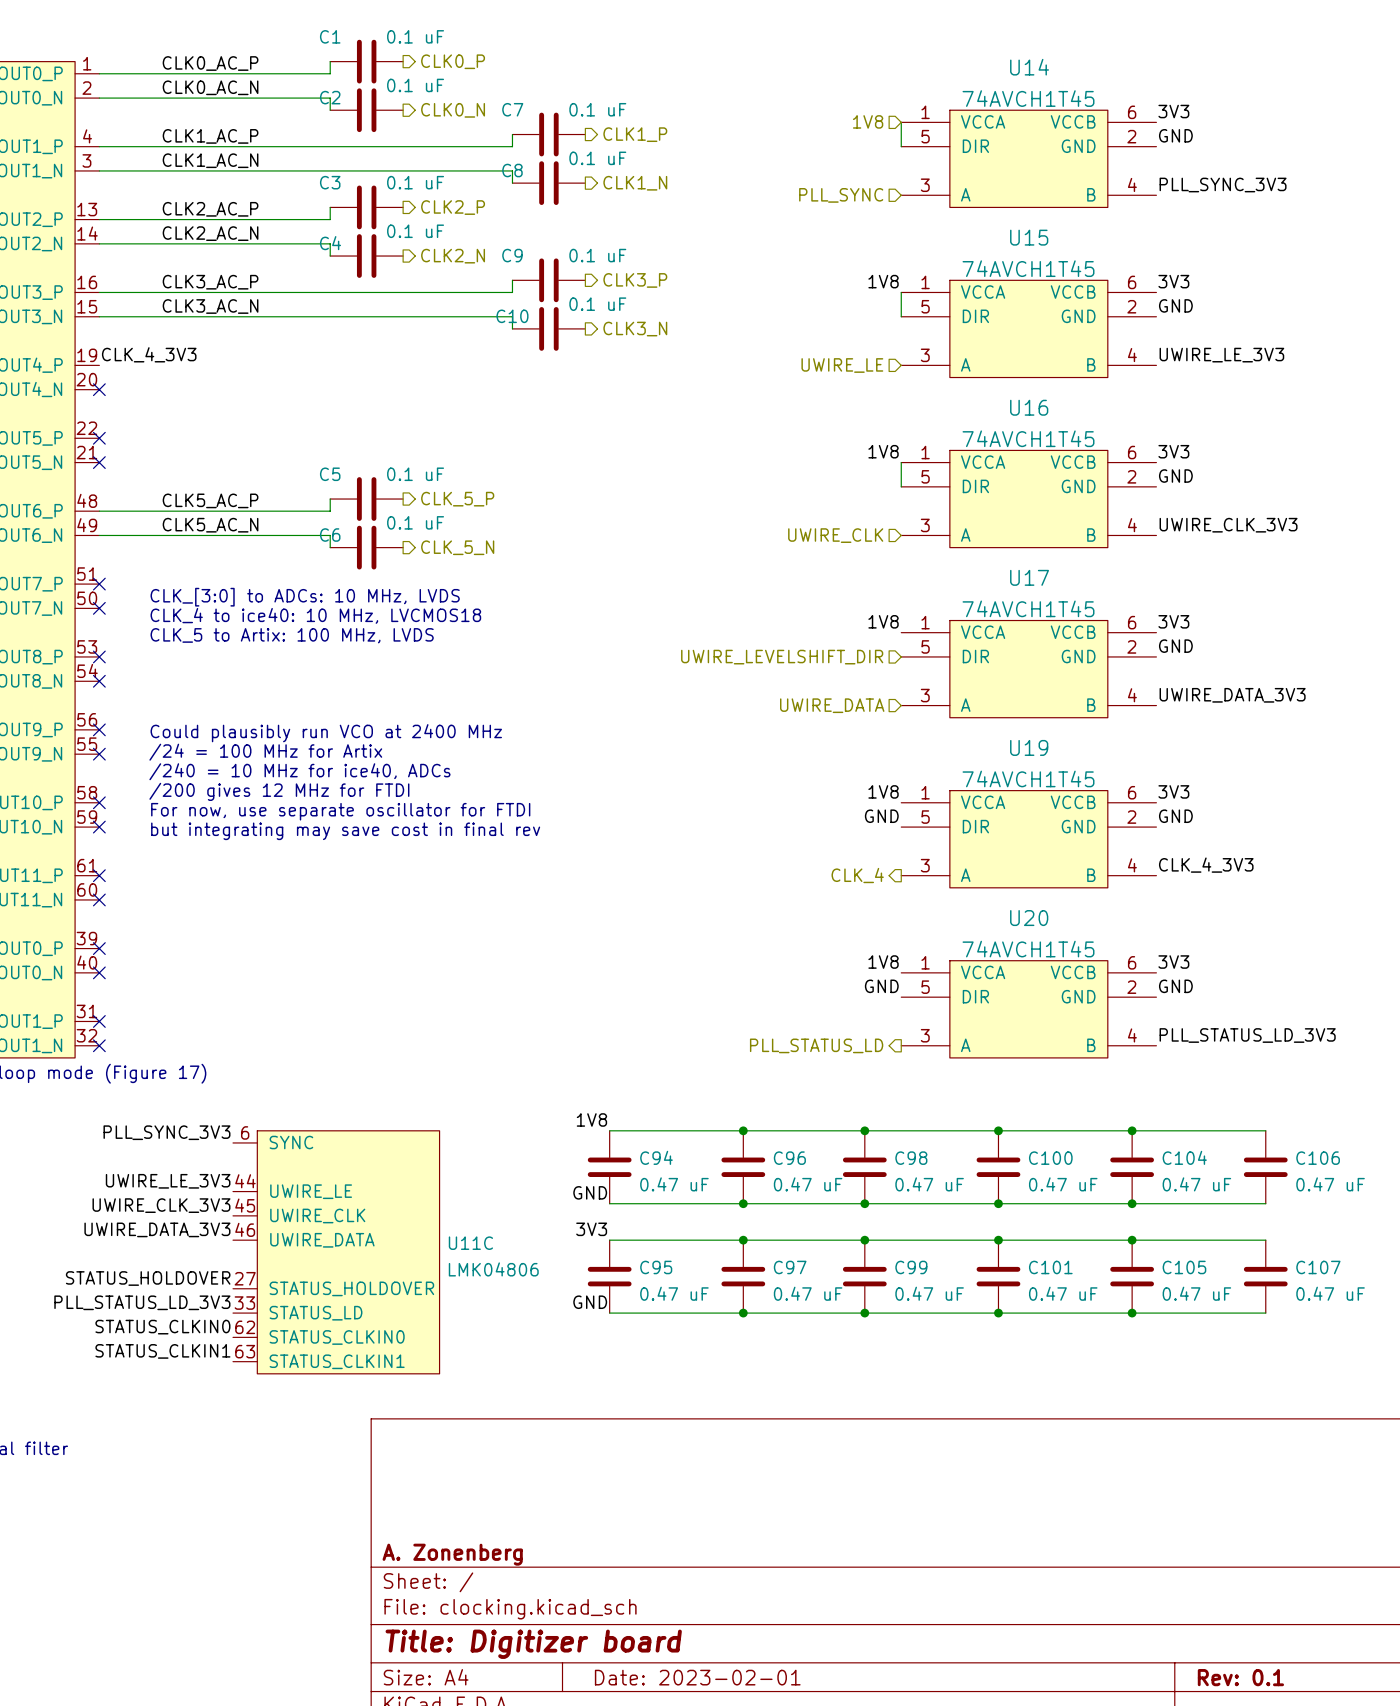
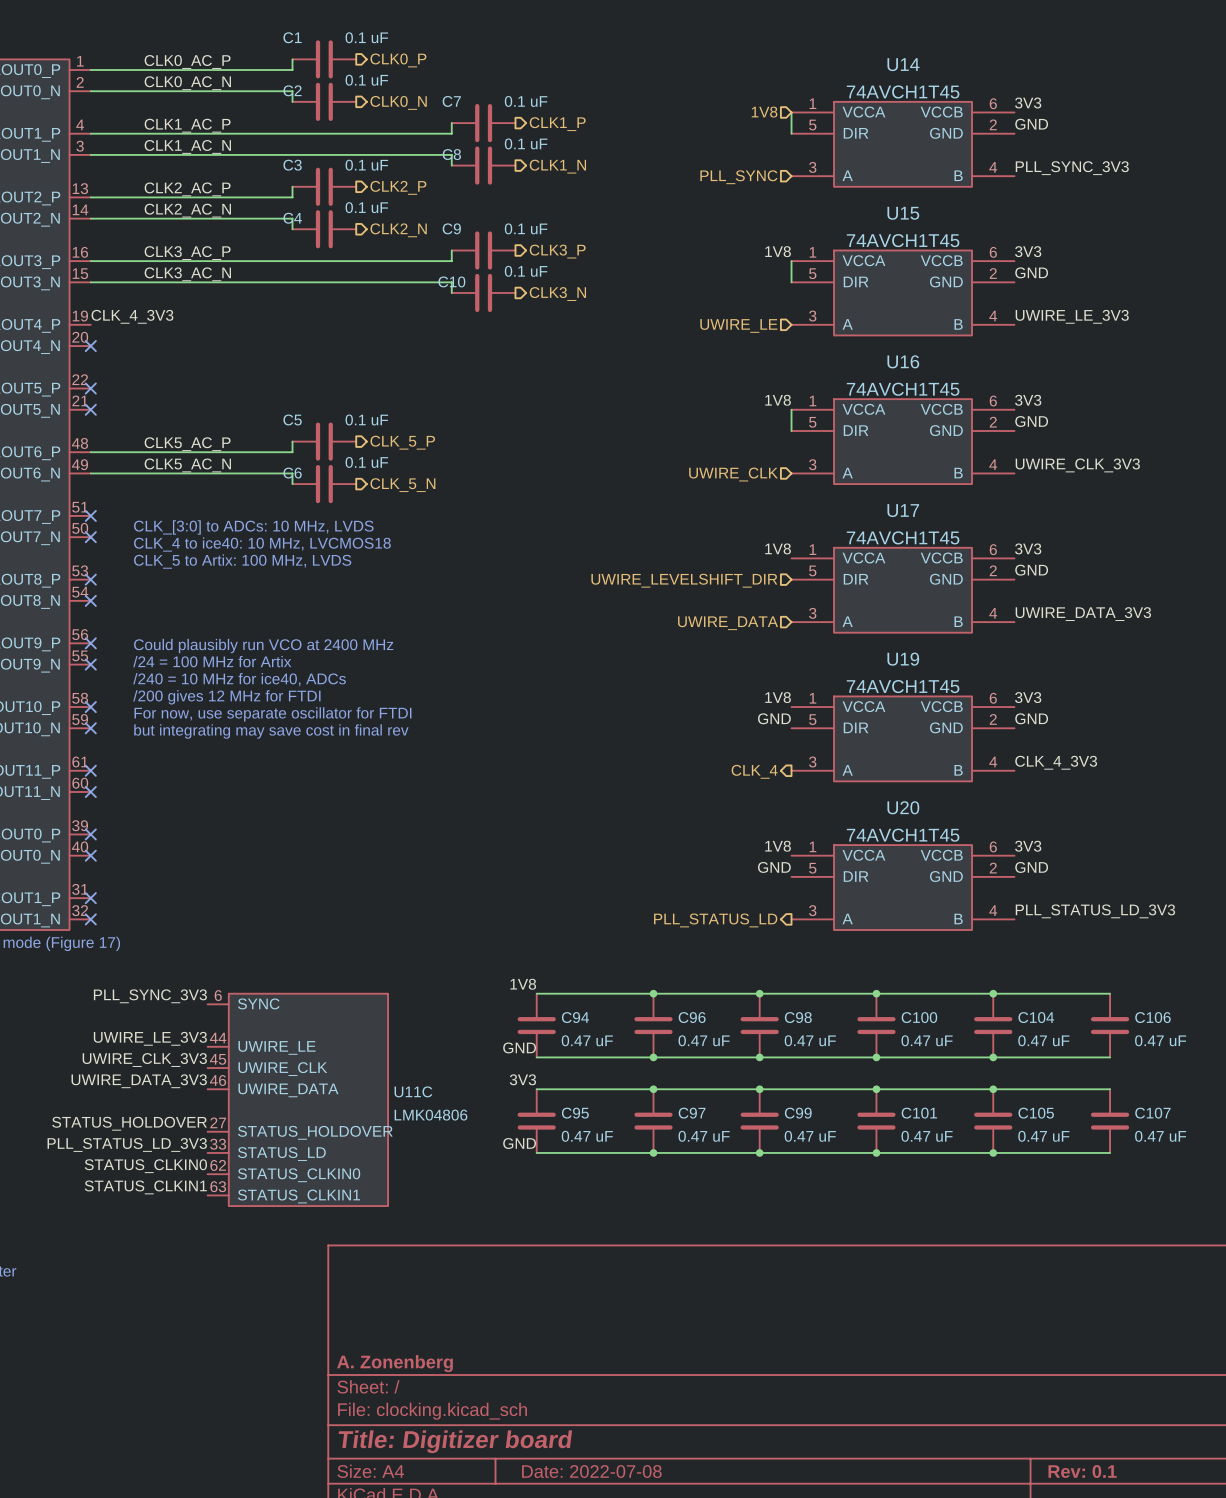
title block: Date: 2023-02-01 (697, 1677) -> Date: 2022-07-08 (591, 1471)

